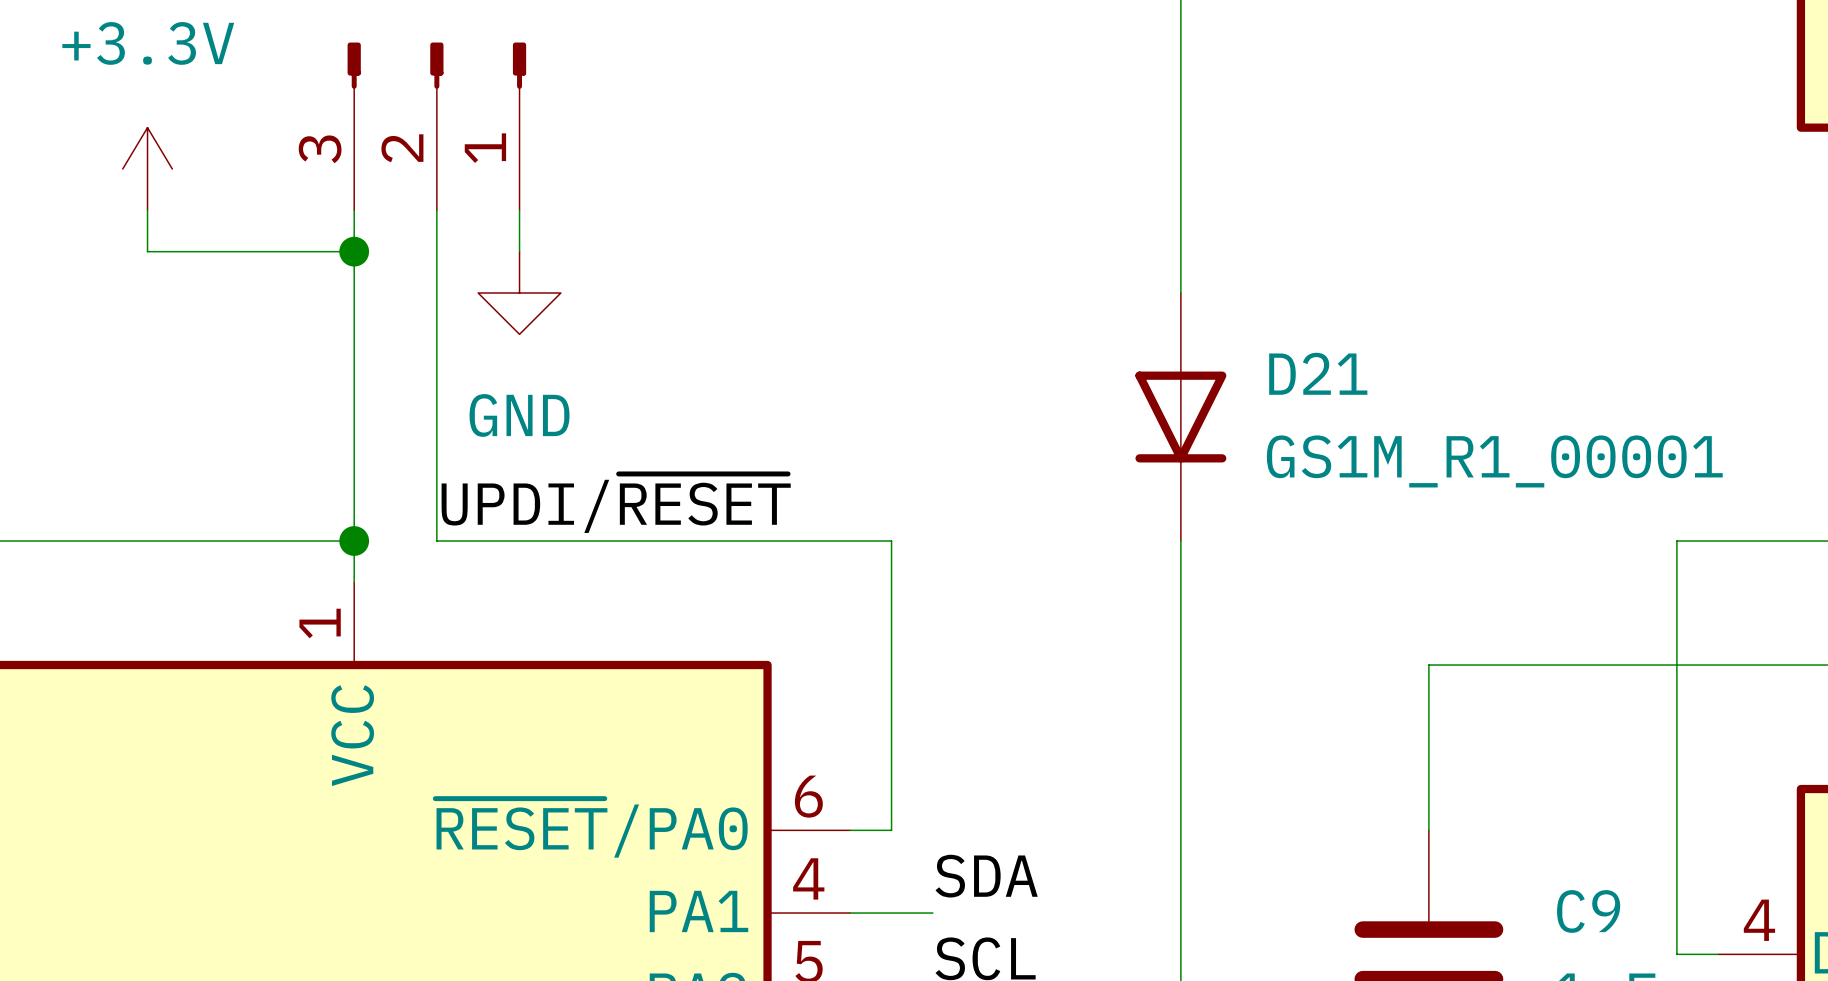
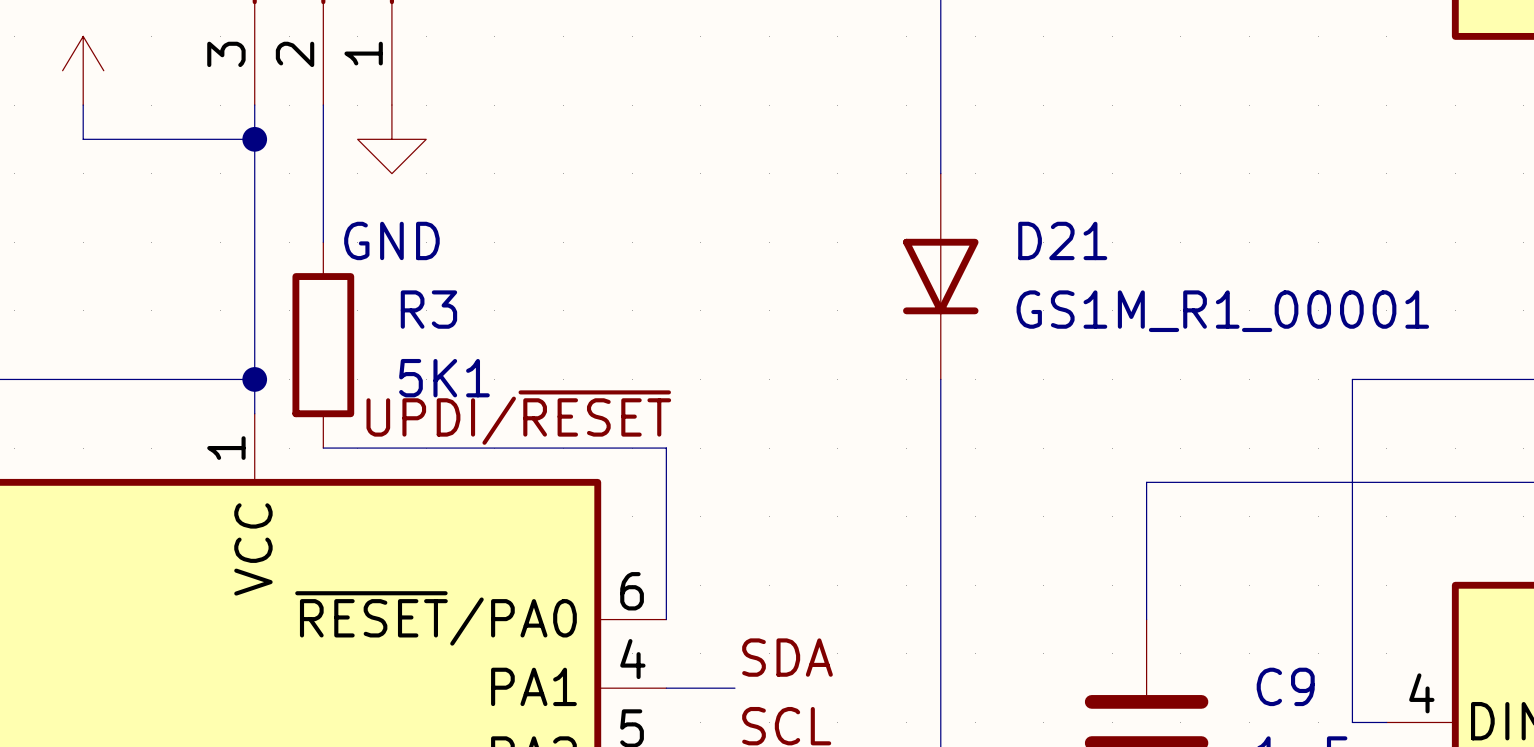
power symbol position: GND (519, 293) -> GND (391, 139)
wire: (436, 375) (436, 541) (891, 541) (891, 830) (850, 830) -> (323, 448) (666, 448) (666, 619)
R3: none -> 5K1 (323, 345)
label position: UPDI/~{RESET} (616, 503) -> UPDI/~{RESET} (518, 417)

